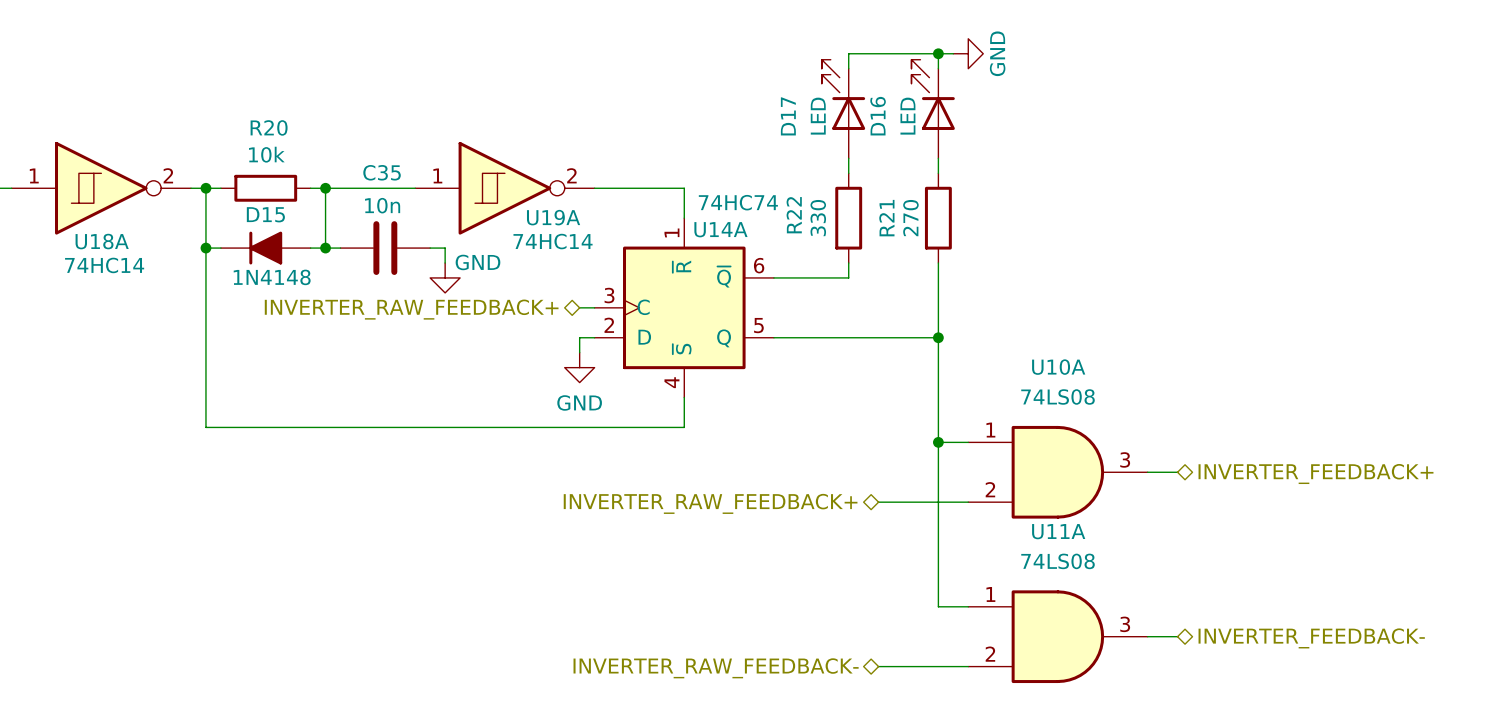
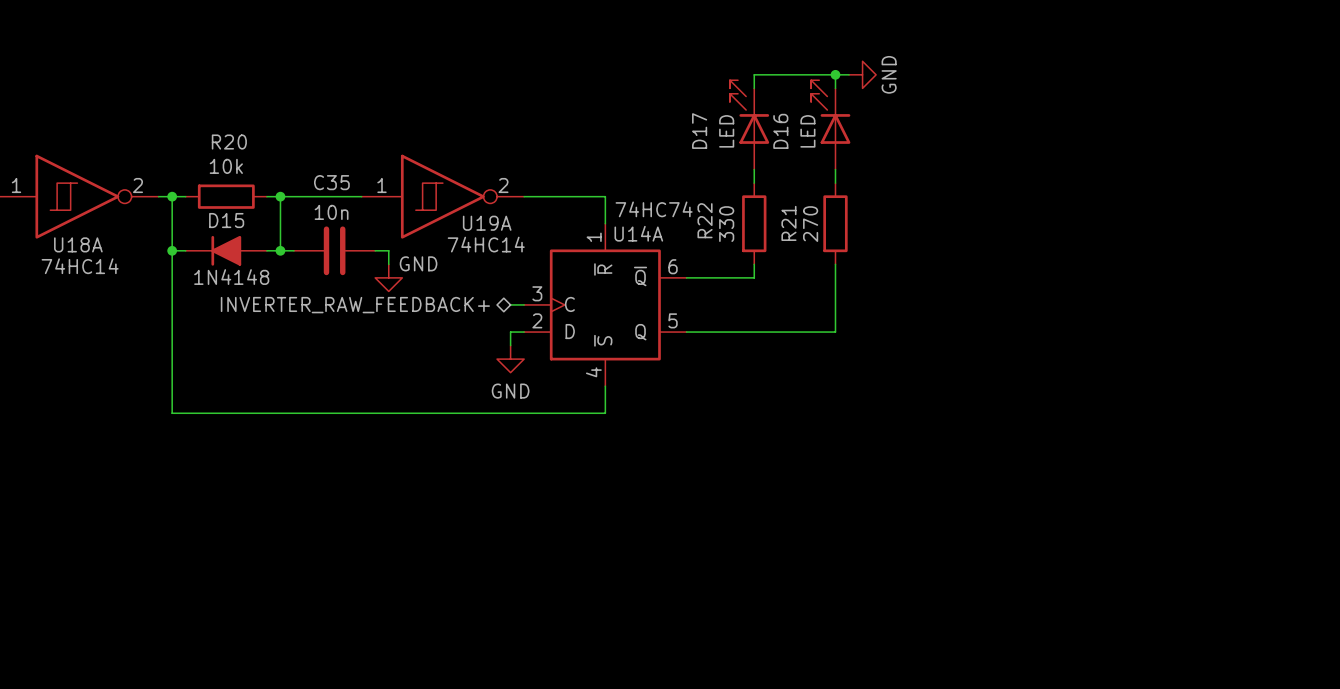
wire: (938, 337) (938, 606) (968, 606) -> none
junction: (938, 337) -> none
wire: (938, 442) (968, 442) -> none
junction: (938, 442) -> none
U10A: 74LS08 (1057, 472) -> none
wire: (1147, 472) (1177, 472) -> none
hierarchical label: INVERTER_FEEDBACK+ (1316, 474) -> none
wire: (878, 502) (968, 502) -> none
hierarchical label: INVERTER_RAW_FEEDBACK+ (710, 503) -> none
U11A: 74LS08 (1057, 636) -> none
wire: (1147, 636) (1177, 636) -> none
hierarchical label: INVERTER_FEEDBACK- (1311, 638) -> none
wire: (878, 666) (968, 666) -> none
hierarchical label: INVERTER_RAW_FEEDBACK- (716, 668) -> none

